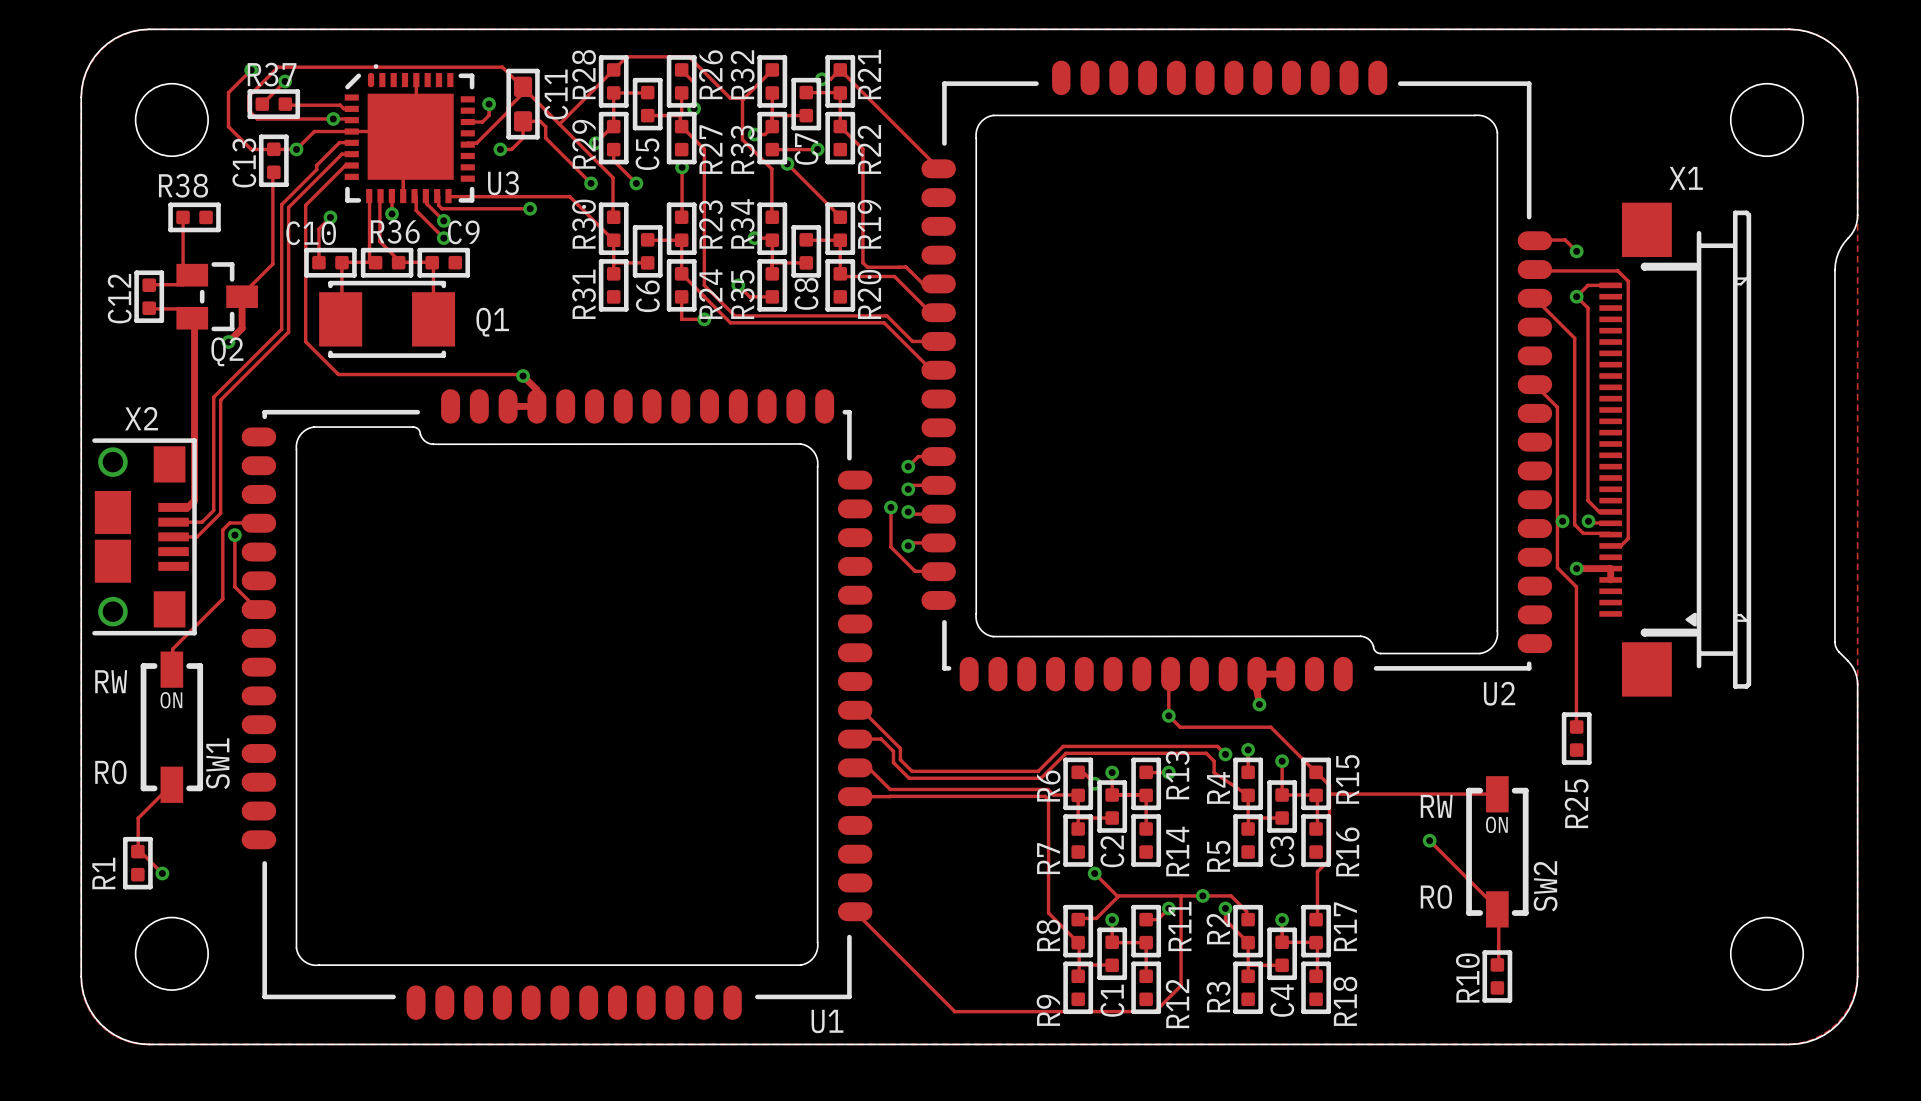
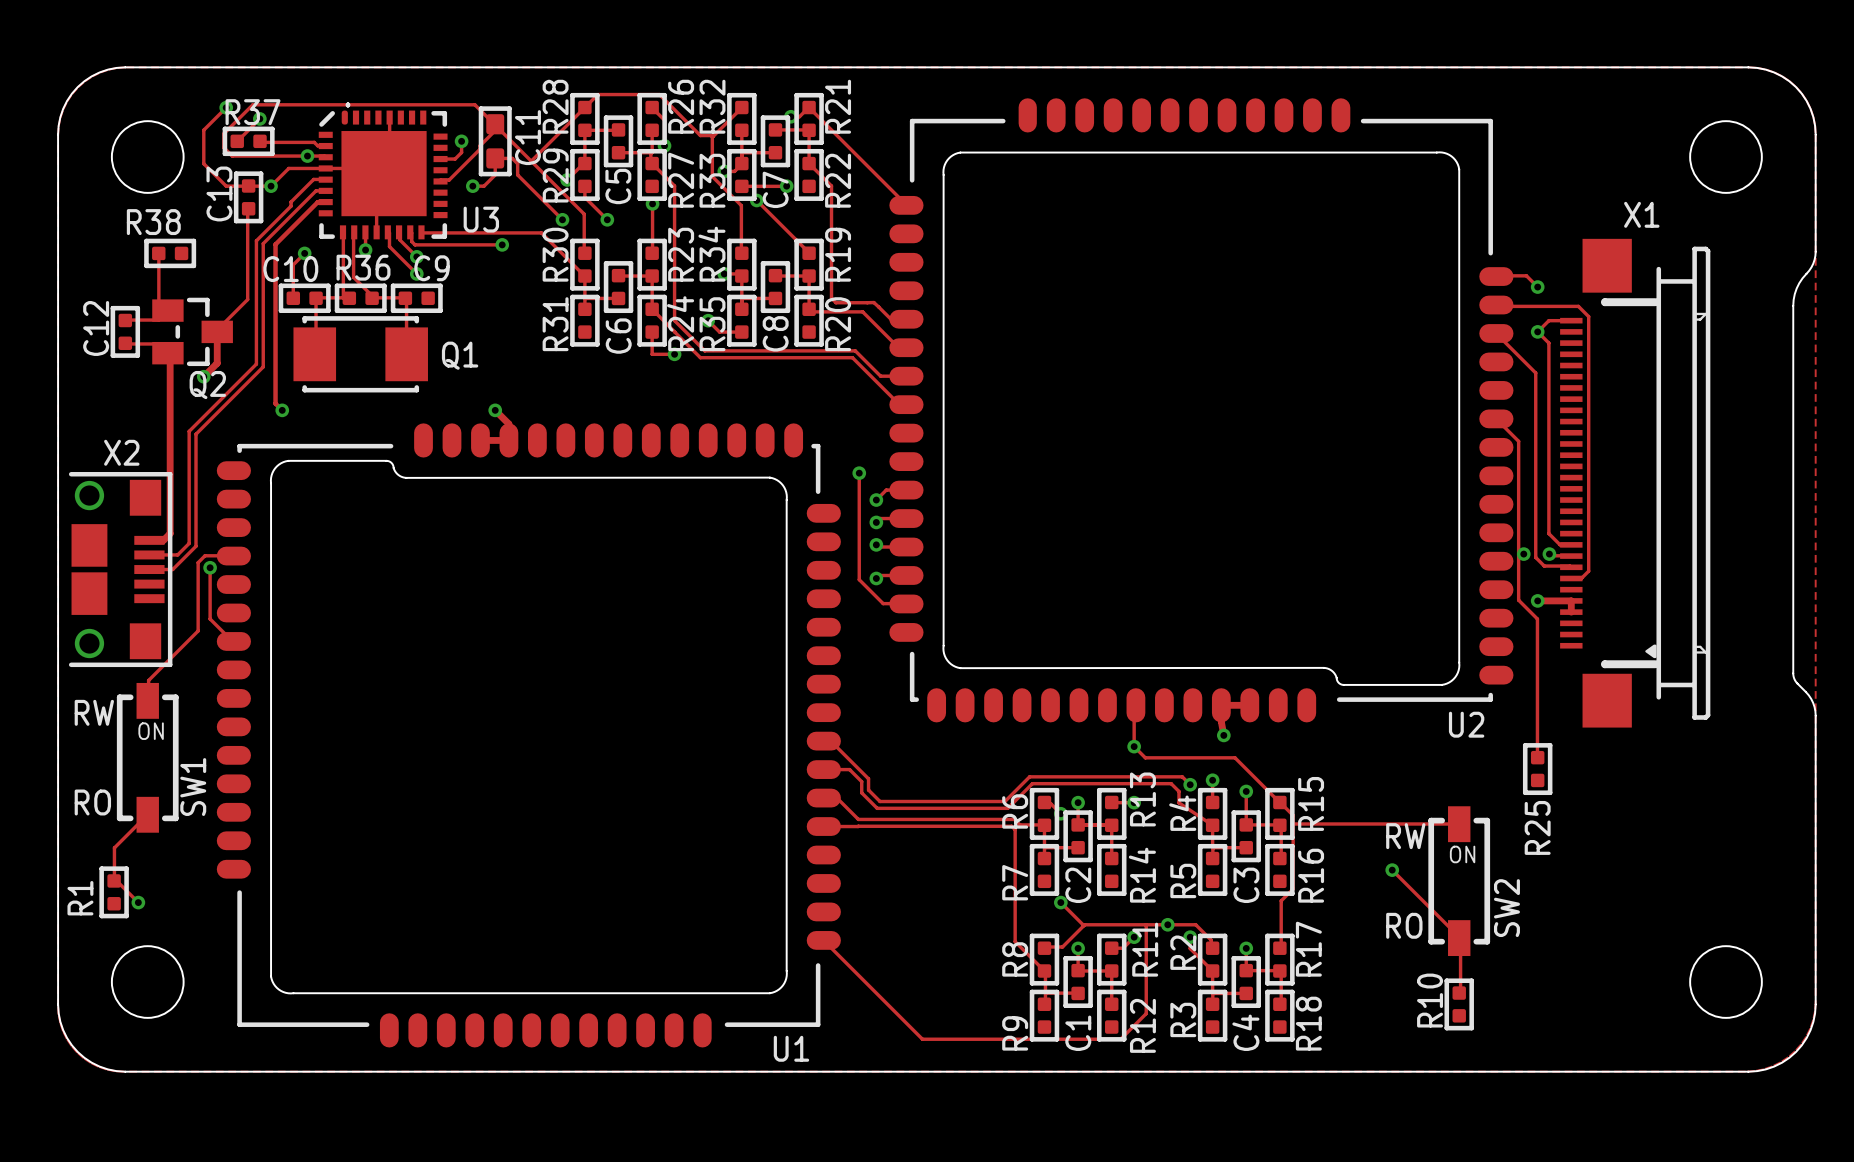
track: (345, 165) (305, 205) (305, 341) (338, 374) (519, 374) -> (319, 202) (275, 244) (275, 403) (282, 410)
via: none -> (282, 410)
track: none -> (859, 473) (859, 540)
via position: (890, 507) -> (859, 473)

